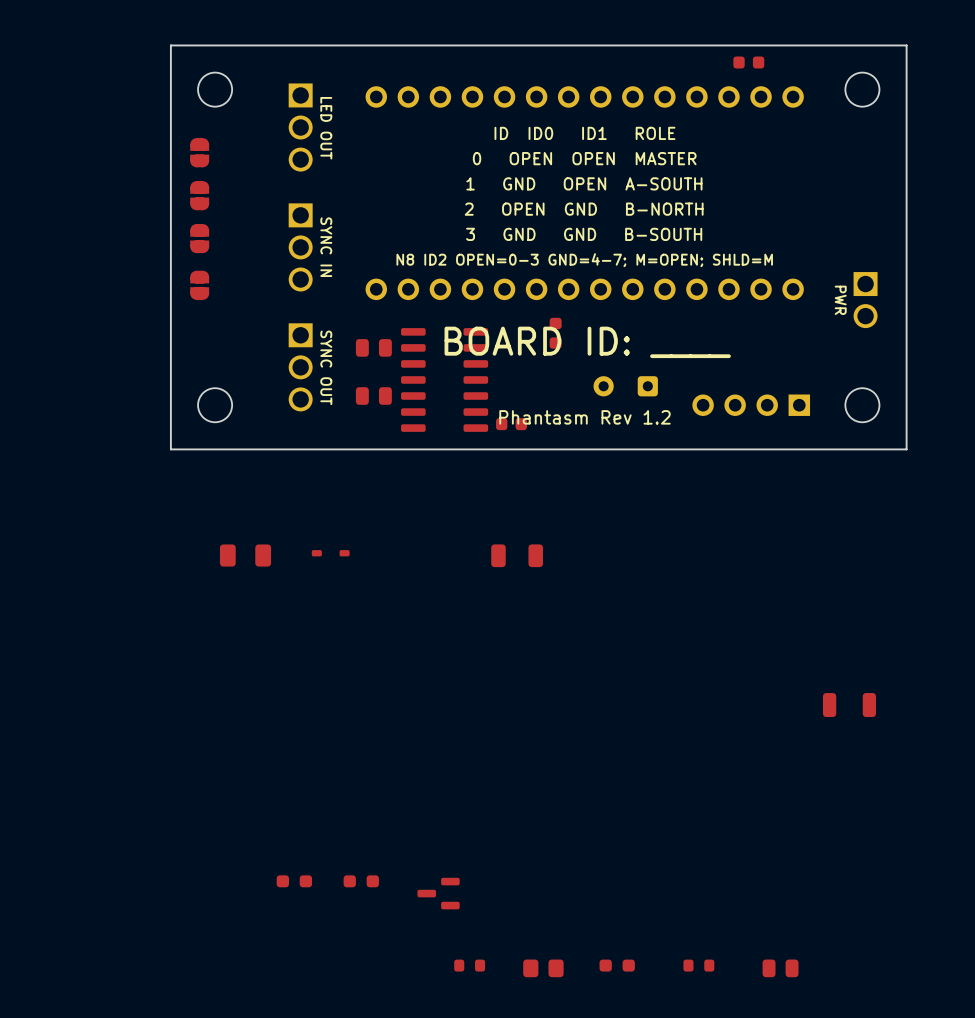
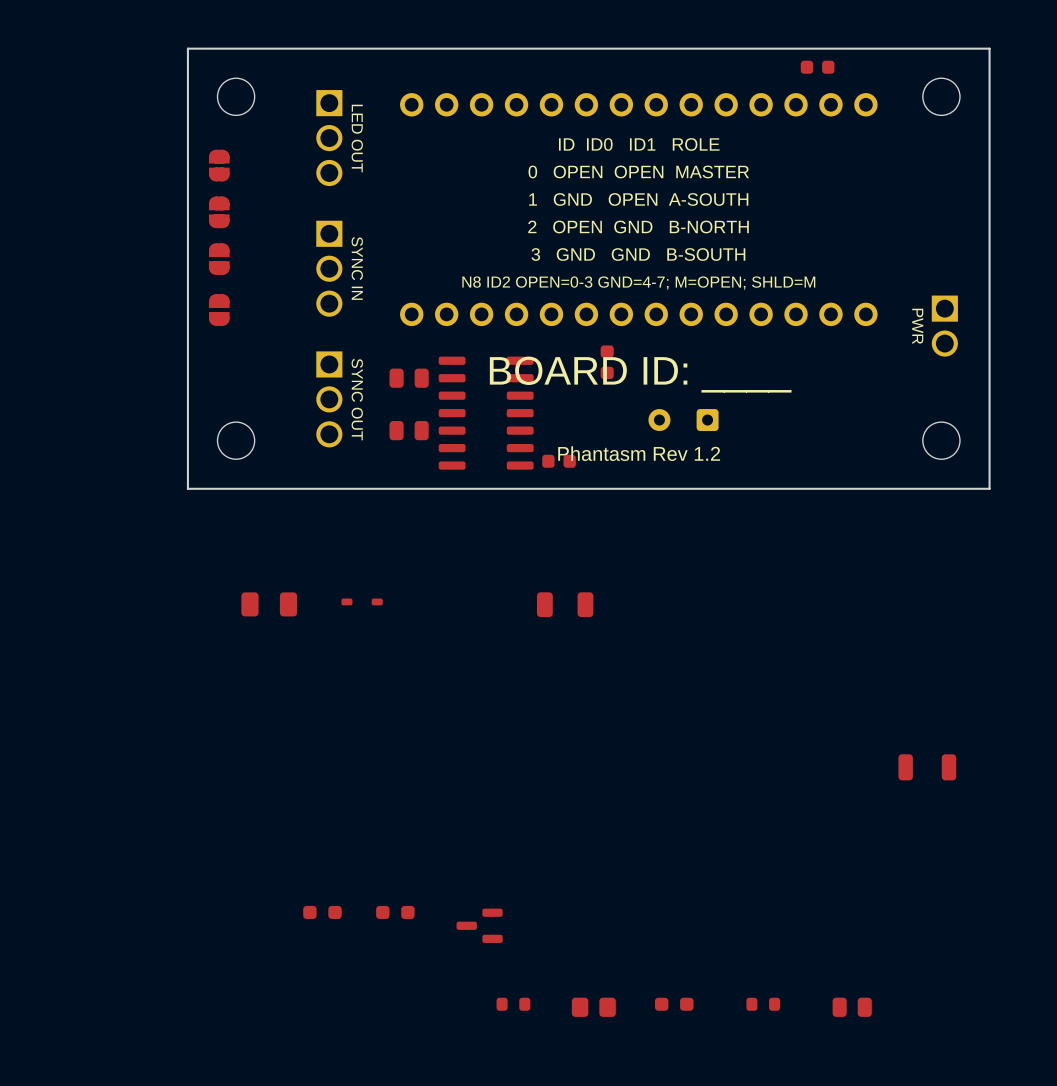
part: (751, 405) -> none
part: none -> (322, 912)
part: none -> (395, 912)
part: (294, 881) -> none
part: (361, 881) -> none
part position: (438, 893) -> (479, 925)
part position: (469, 965) -> (513, 1004)
part position: (617, 965) -> (674, 1004)
part position: (698, 965) -> (763, 1004)
part position: (543, 968) -> (593, 1007)
part position: (780, 968) -> (852, 1007)

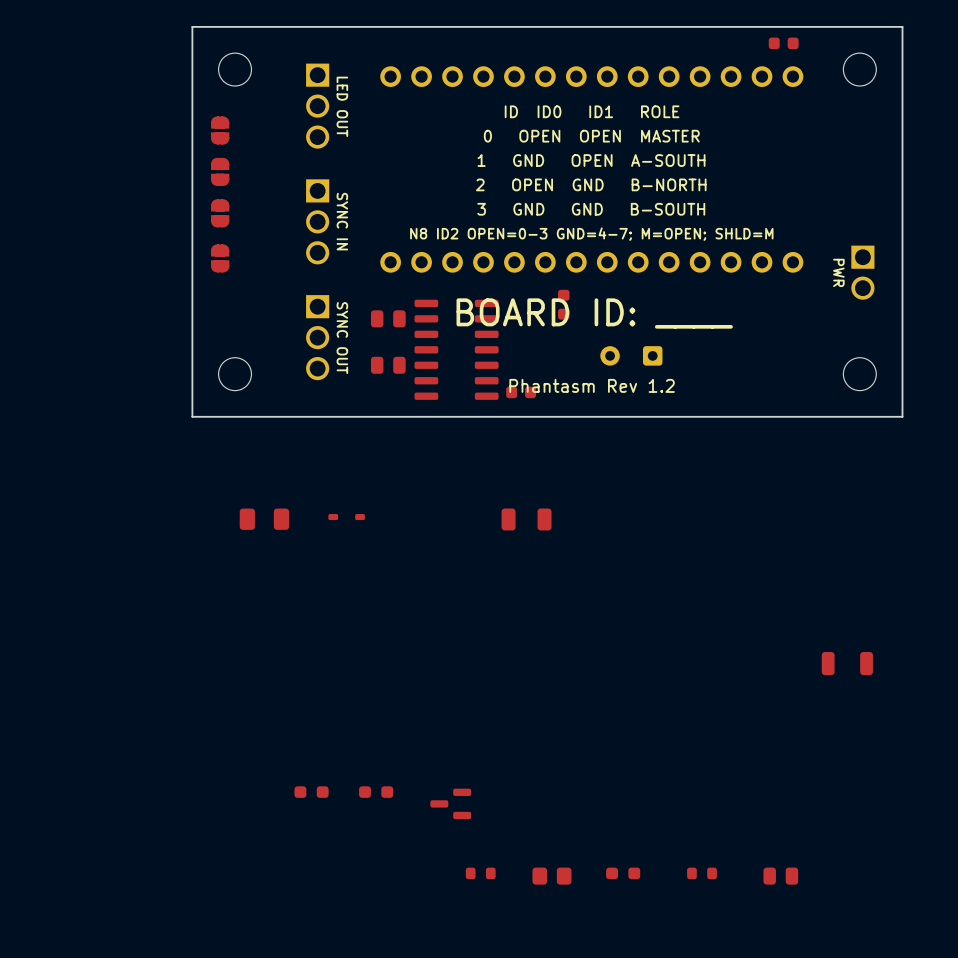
part position: (817, 67) -> (783, 43)

